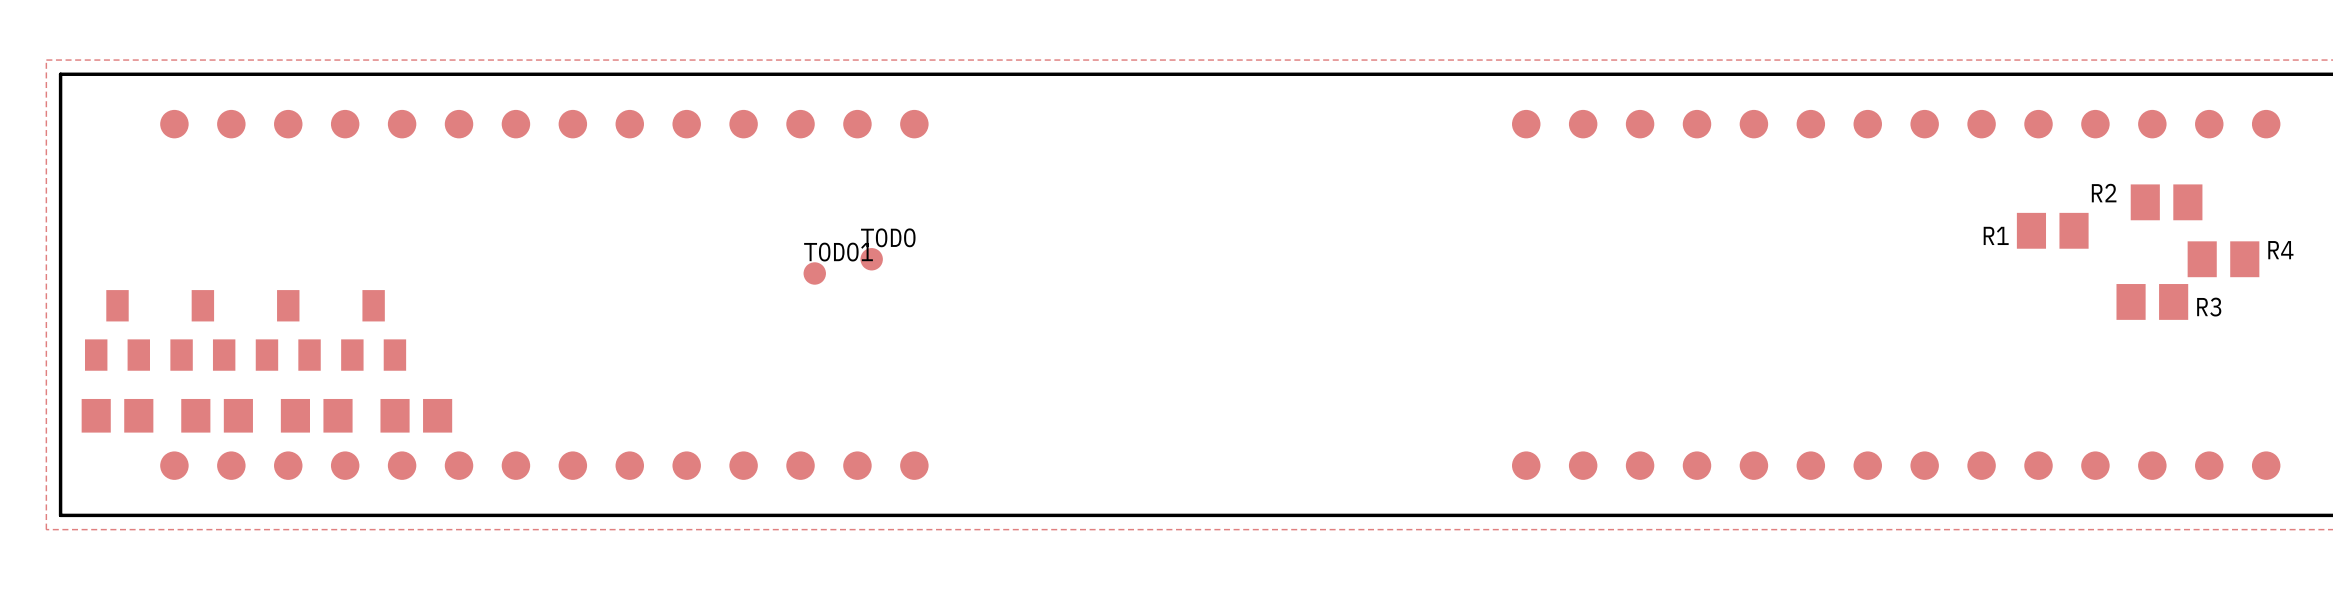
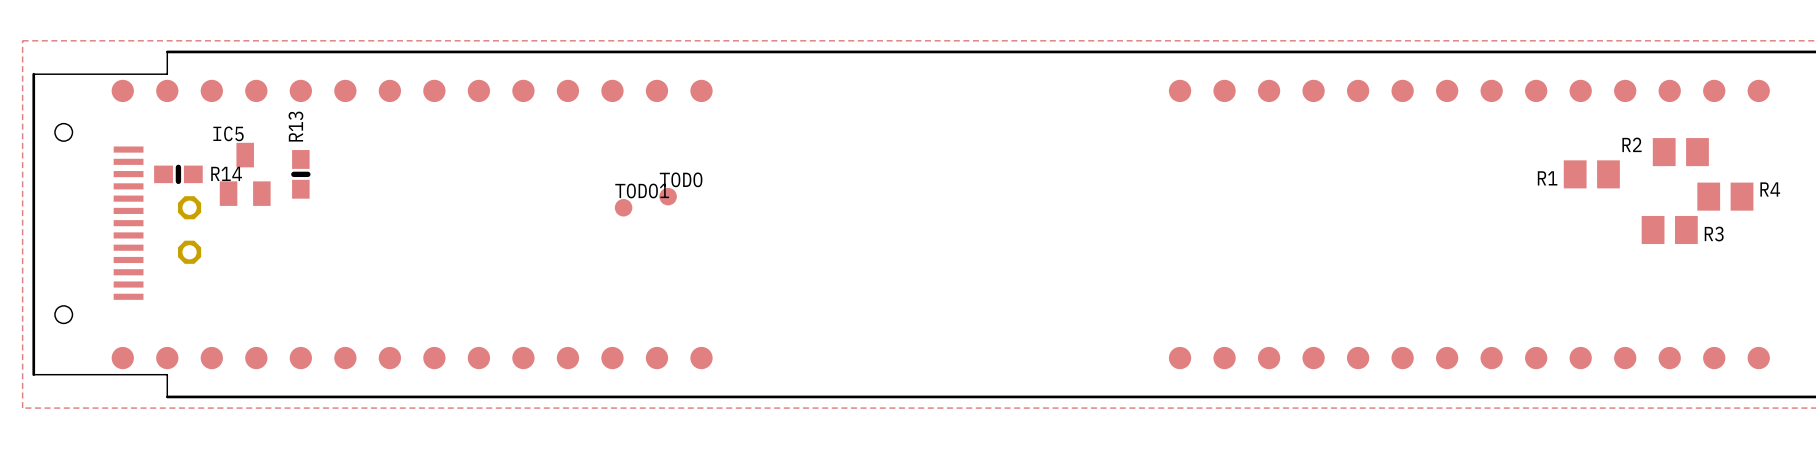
board edge: (231, 74) (60, 74) (60, 102) -> (167, 51) (167, 74) (33, 74)
R14: none -> (178, 174)
IC5: none -> (245, 174)
R13: none -> (300, 174)
part: none -> (99, 223)
part: none -> (189, 230)
part: (117, 330) -> none
part: (202, 330) -> none
part: (288, 330) -> none
part: (373, 330) -> none
part: (117, 415) -> none
part: (217, 415) -> none
part: (316, 415) -> none
part: (416, 415) -> none
board edge: (60, 486) (60, 515) (231, 515) -> (33, 374) (167, 374) (167, 396)

